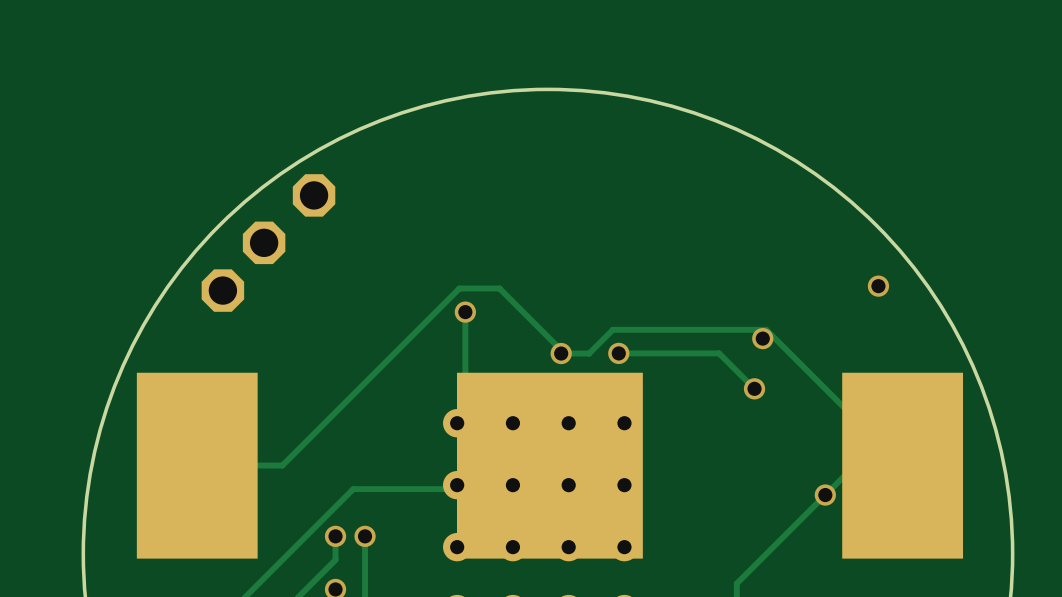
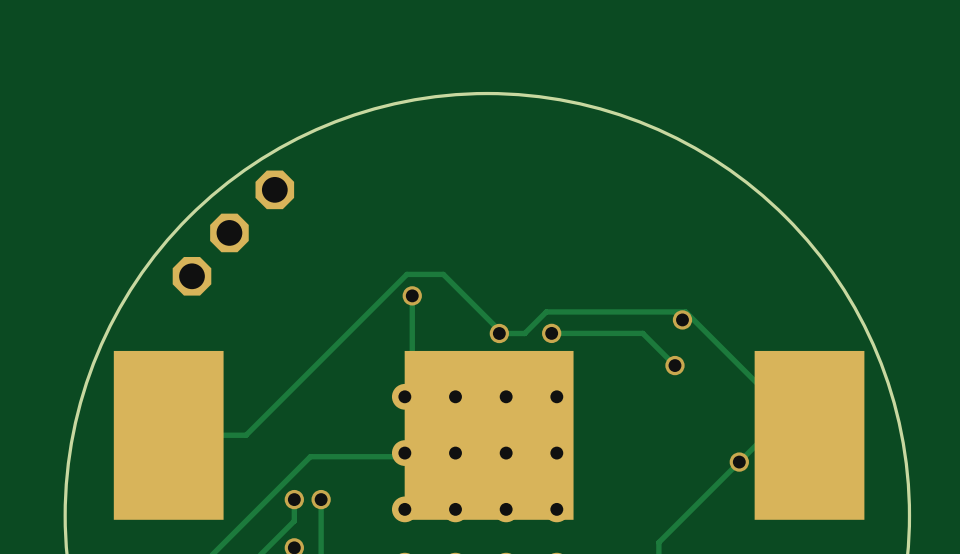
via: (878, 286) -> none

